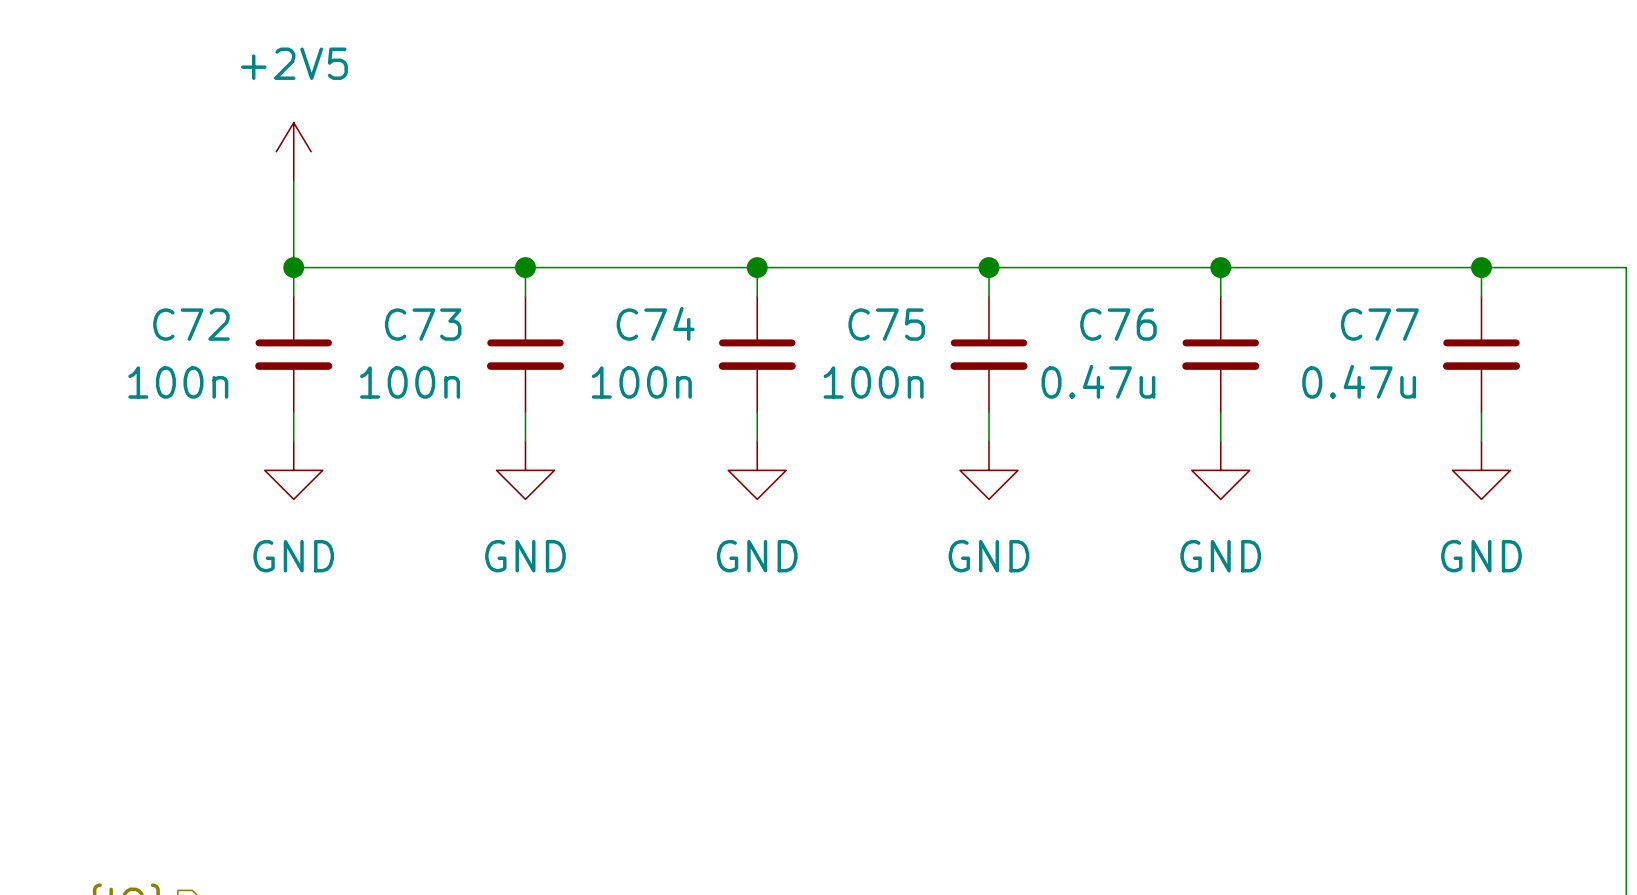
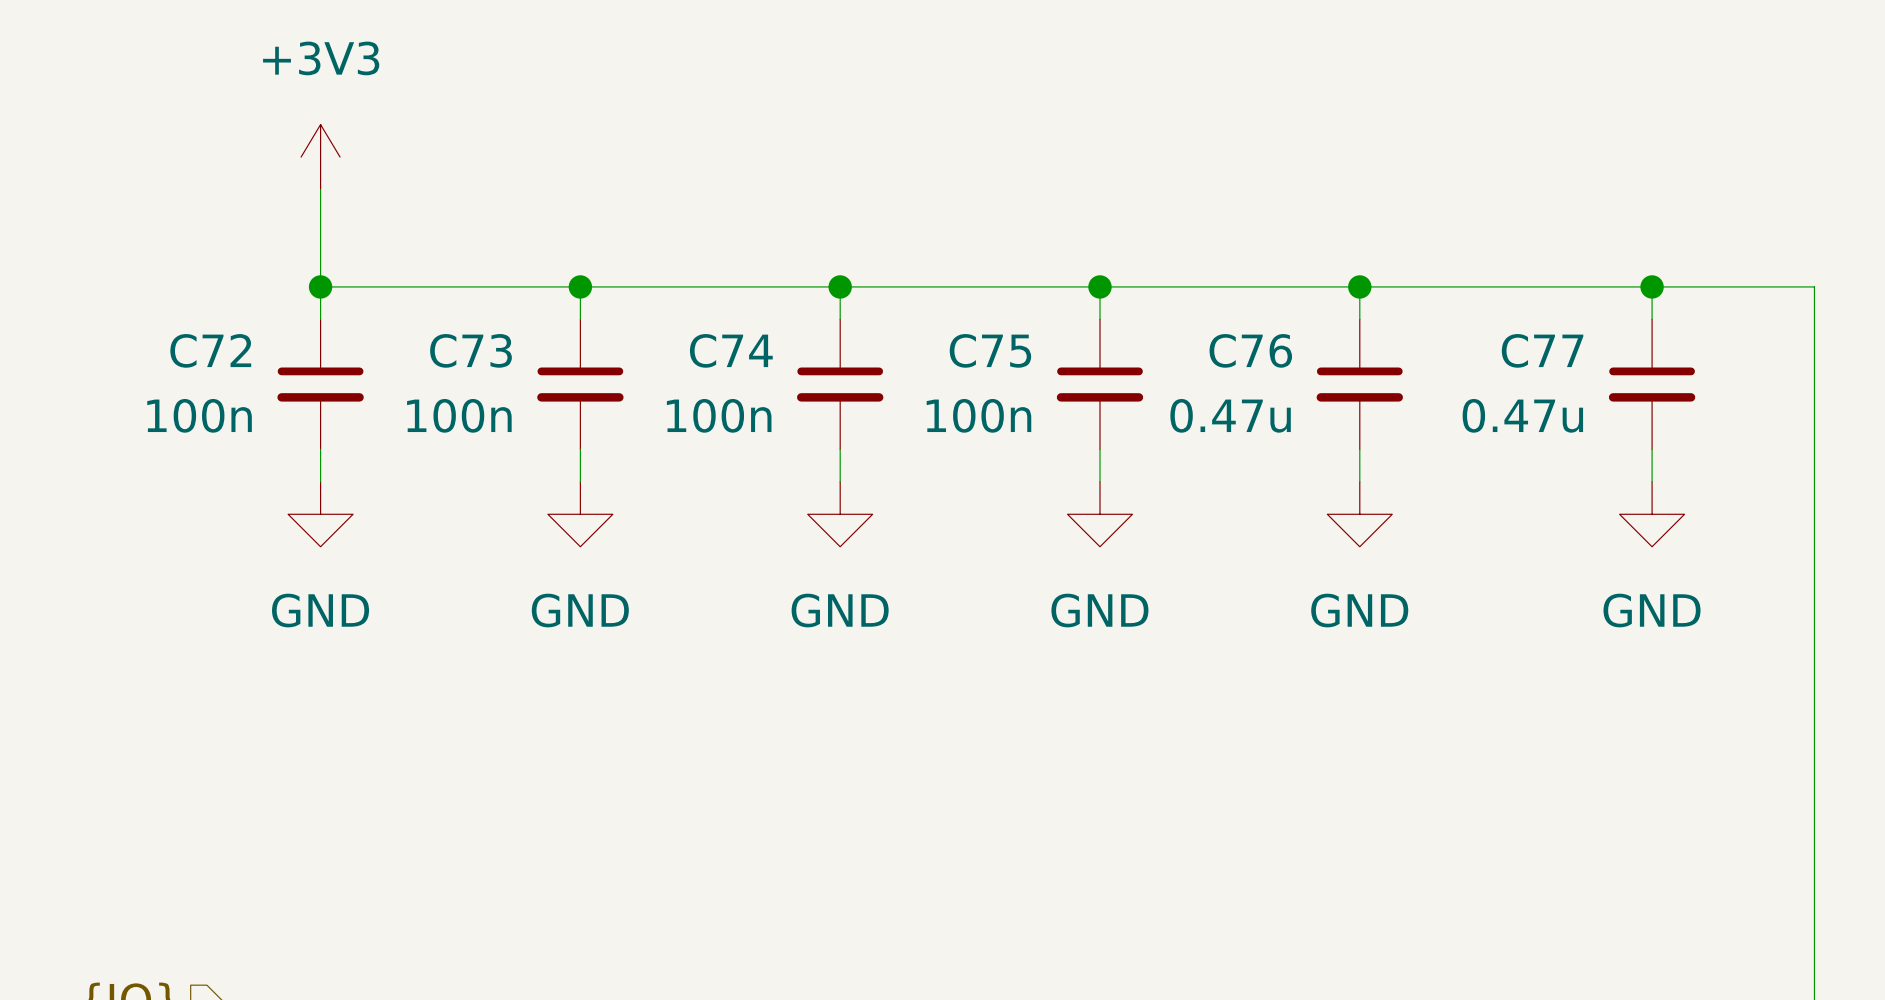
power symbol: +2V5 (293, 151) -> +3V3 (320, 157)

